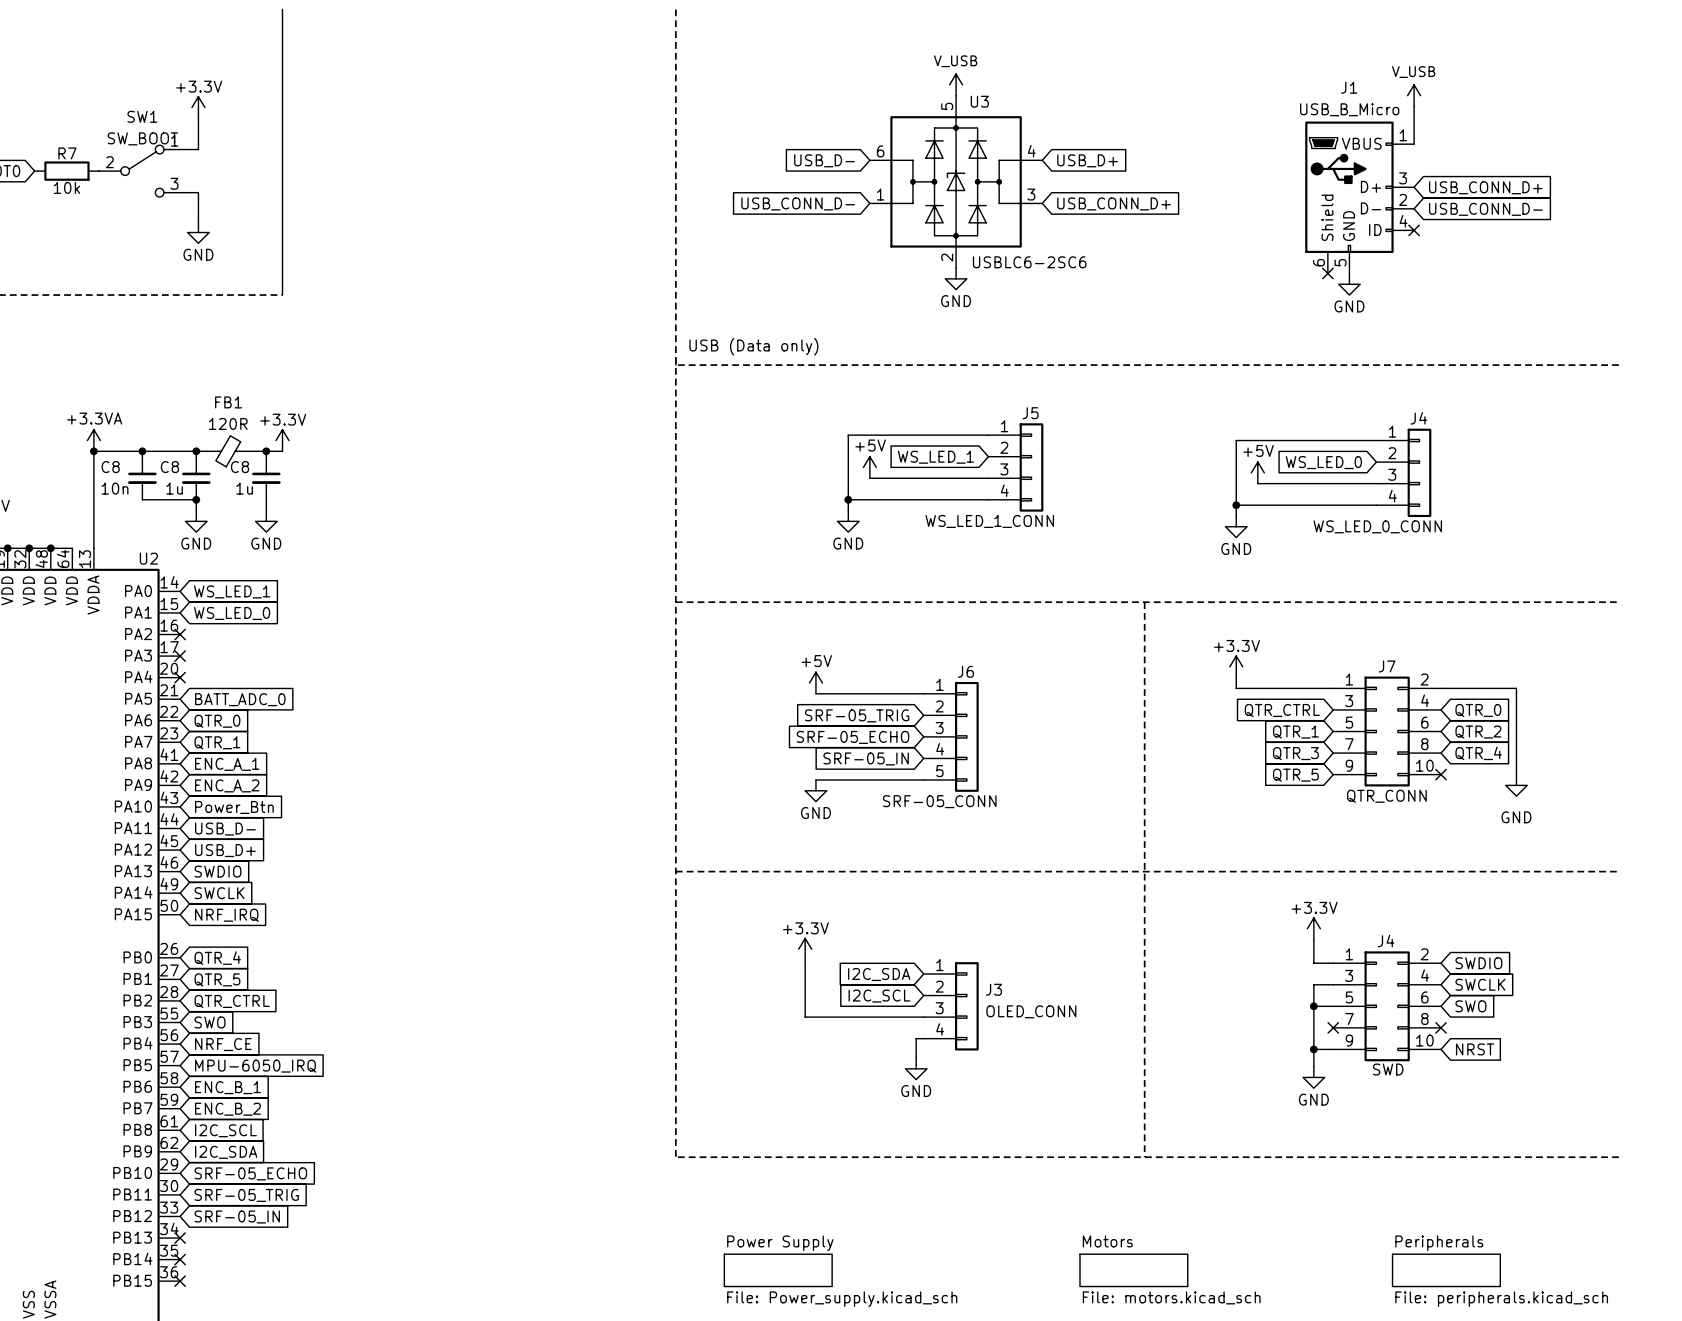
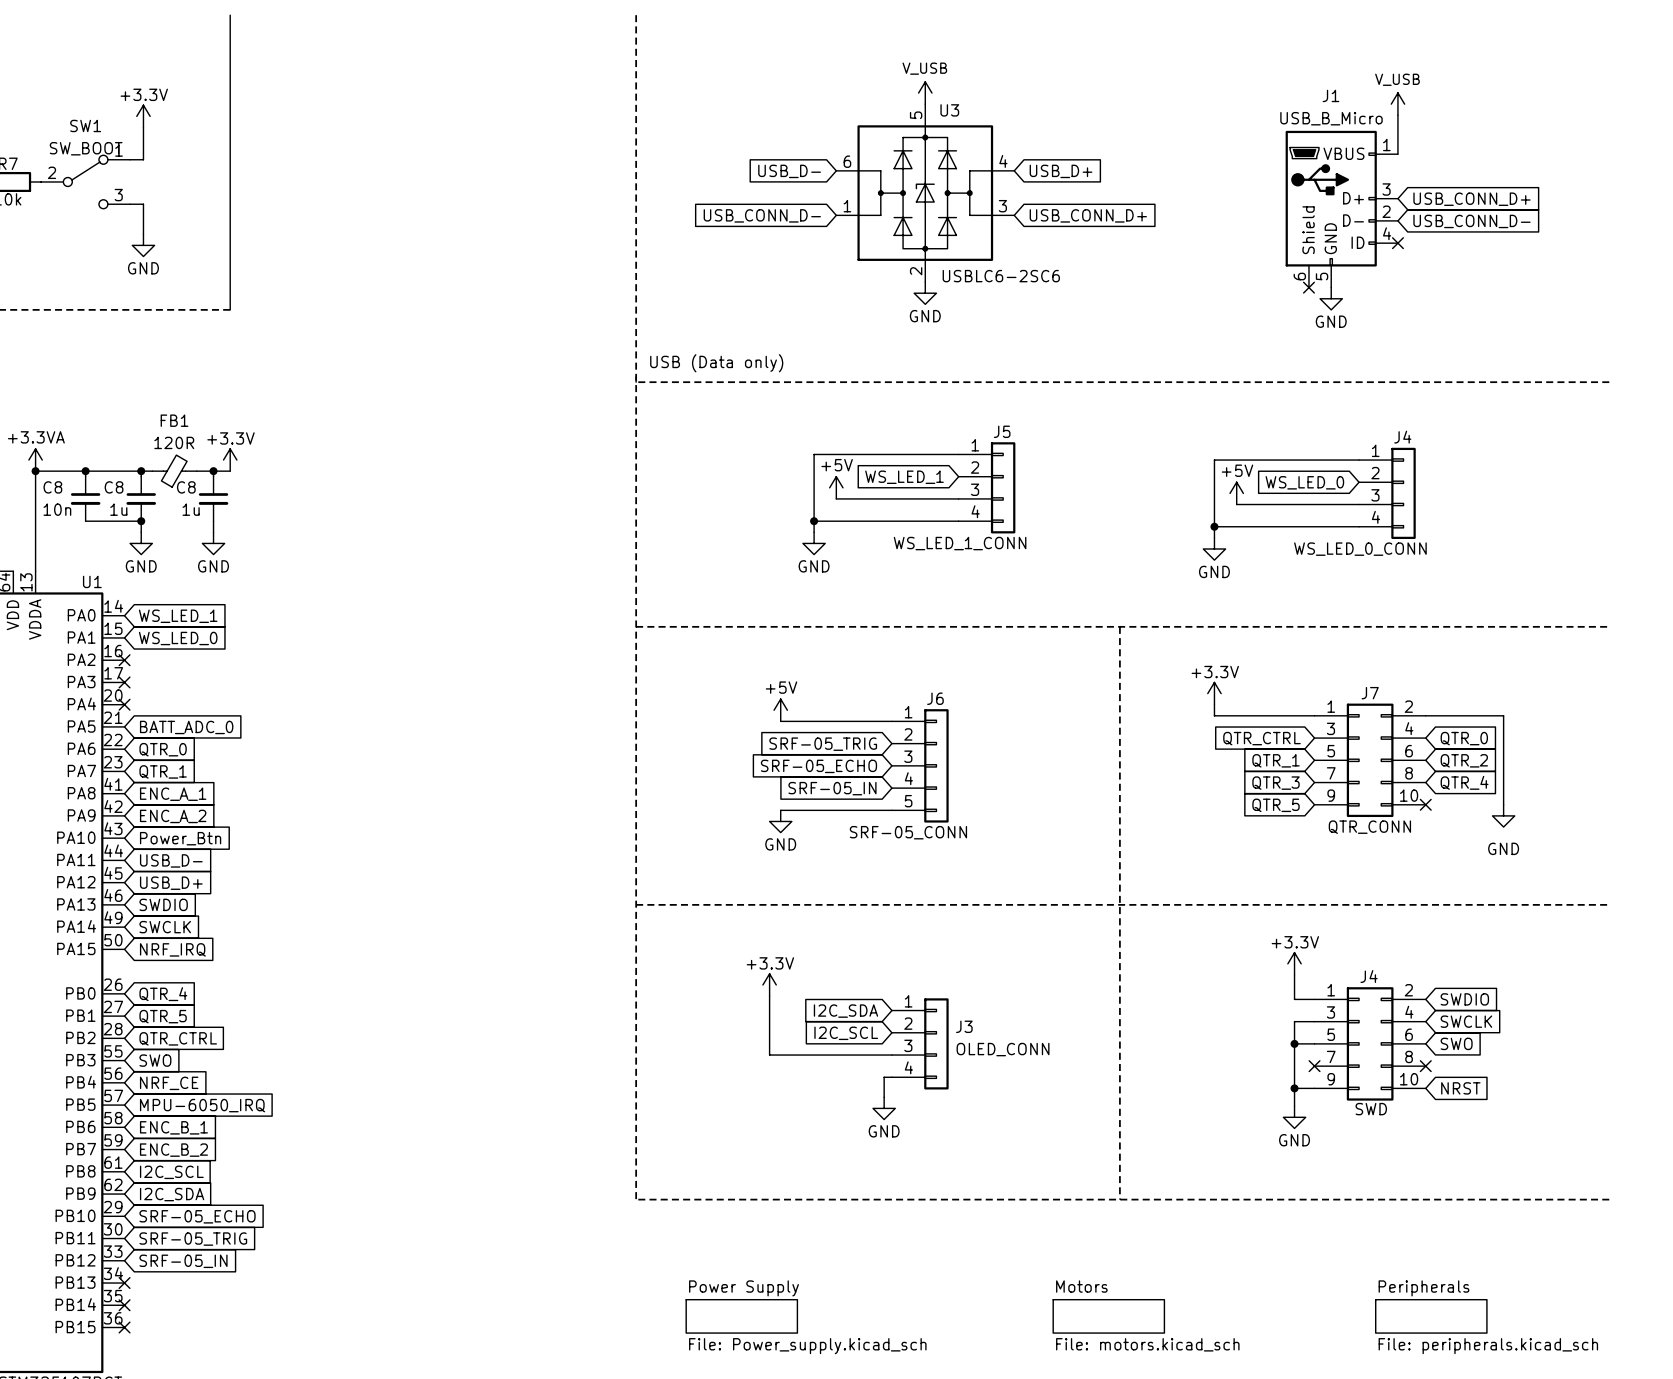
U2 name: U2 (148, 558) -> U1 (92, 581)

